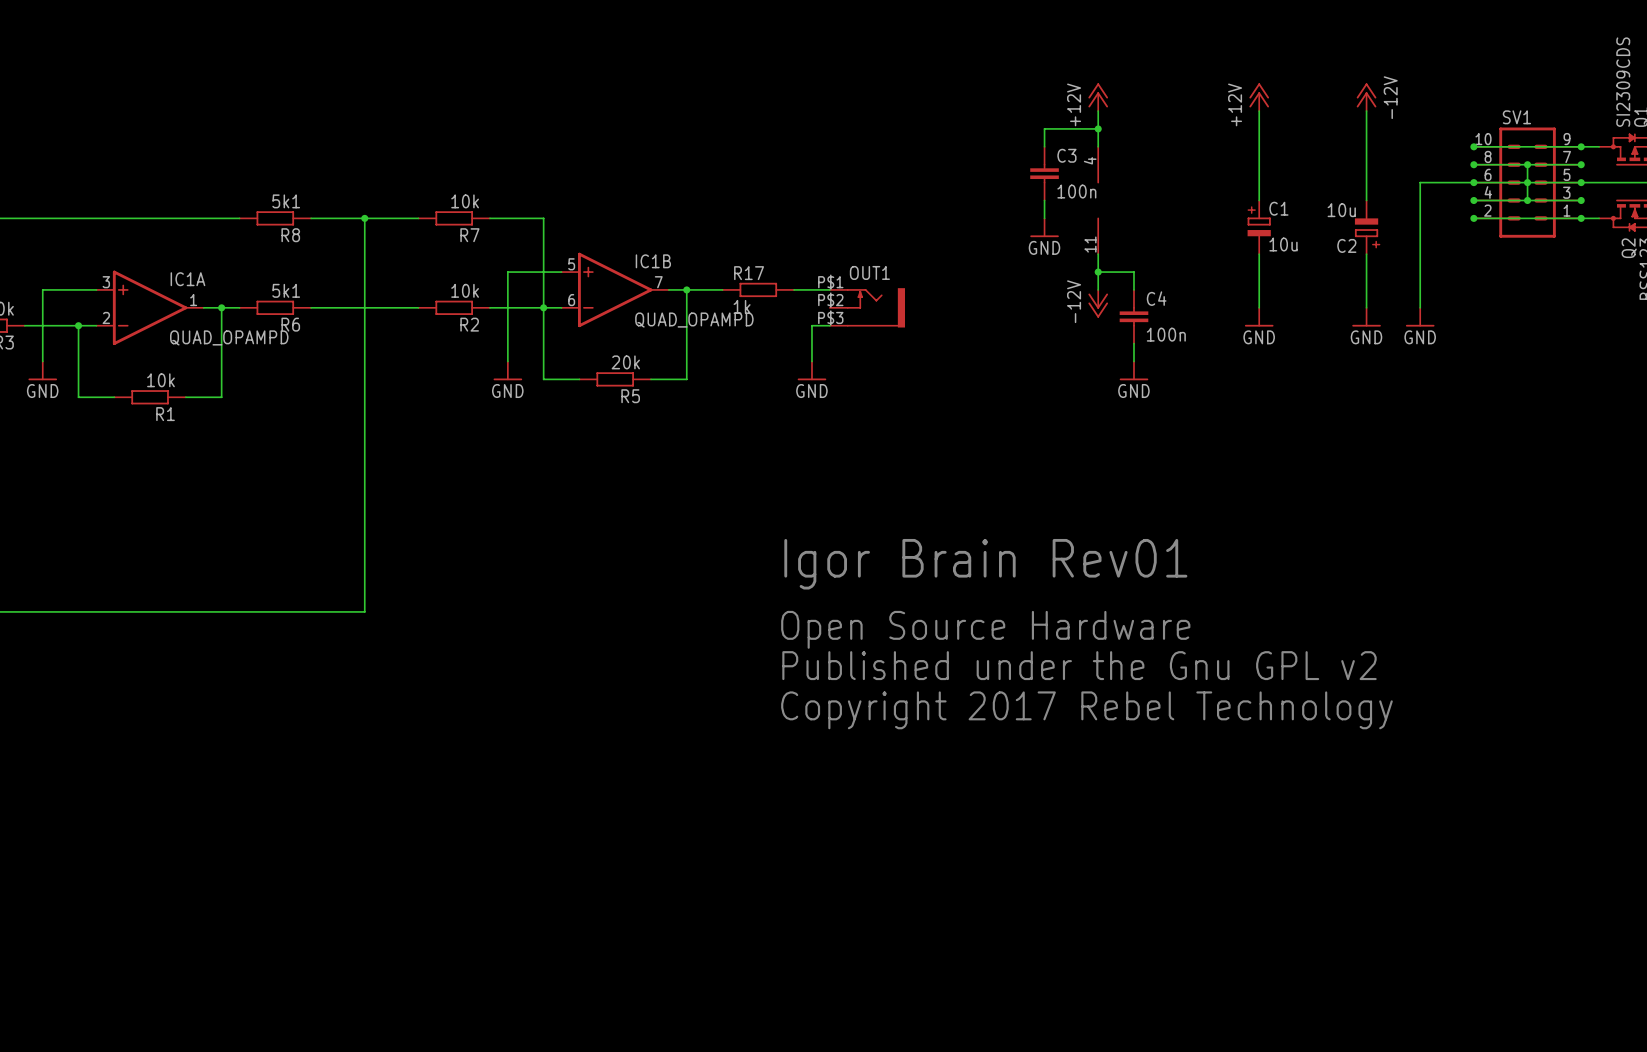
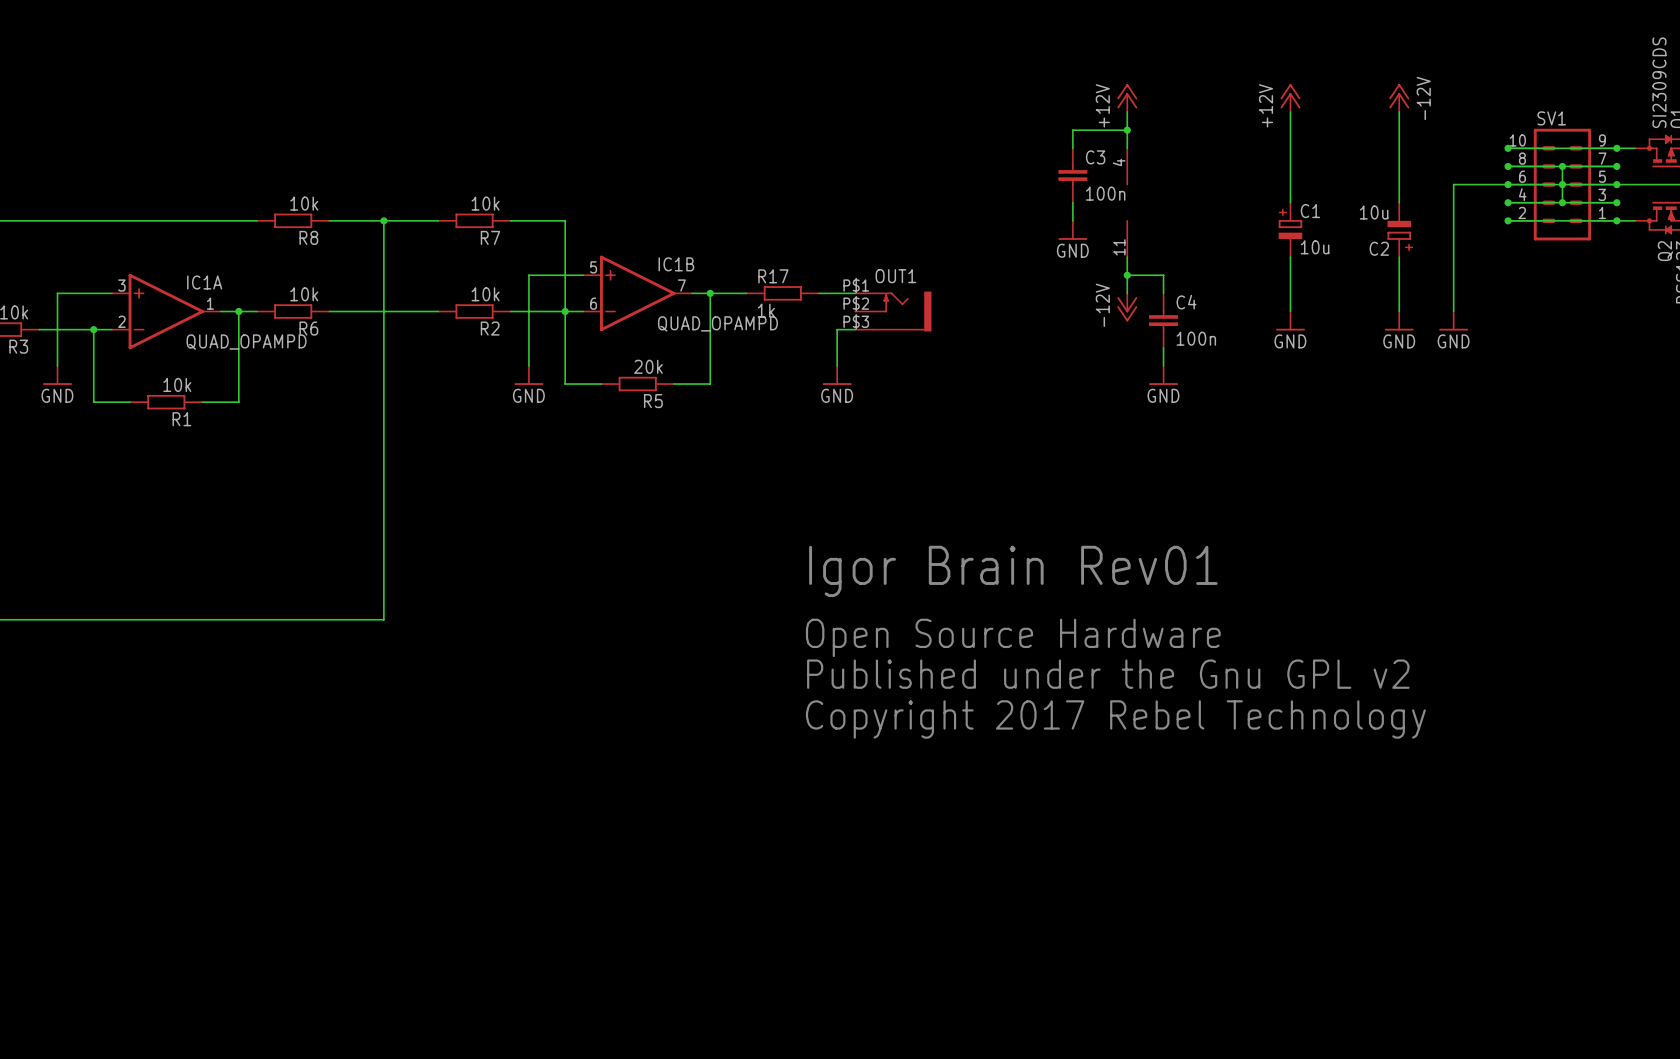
R8 value: 5k1 (286, 201) -> 10k (304, 203)
R6 value: 5k1 (286, 290) -> 10k (304, 294)

